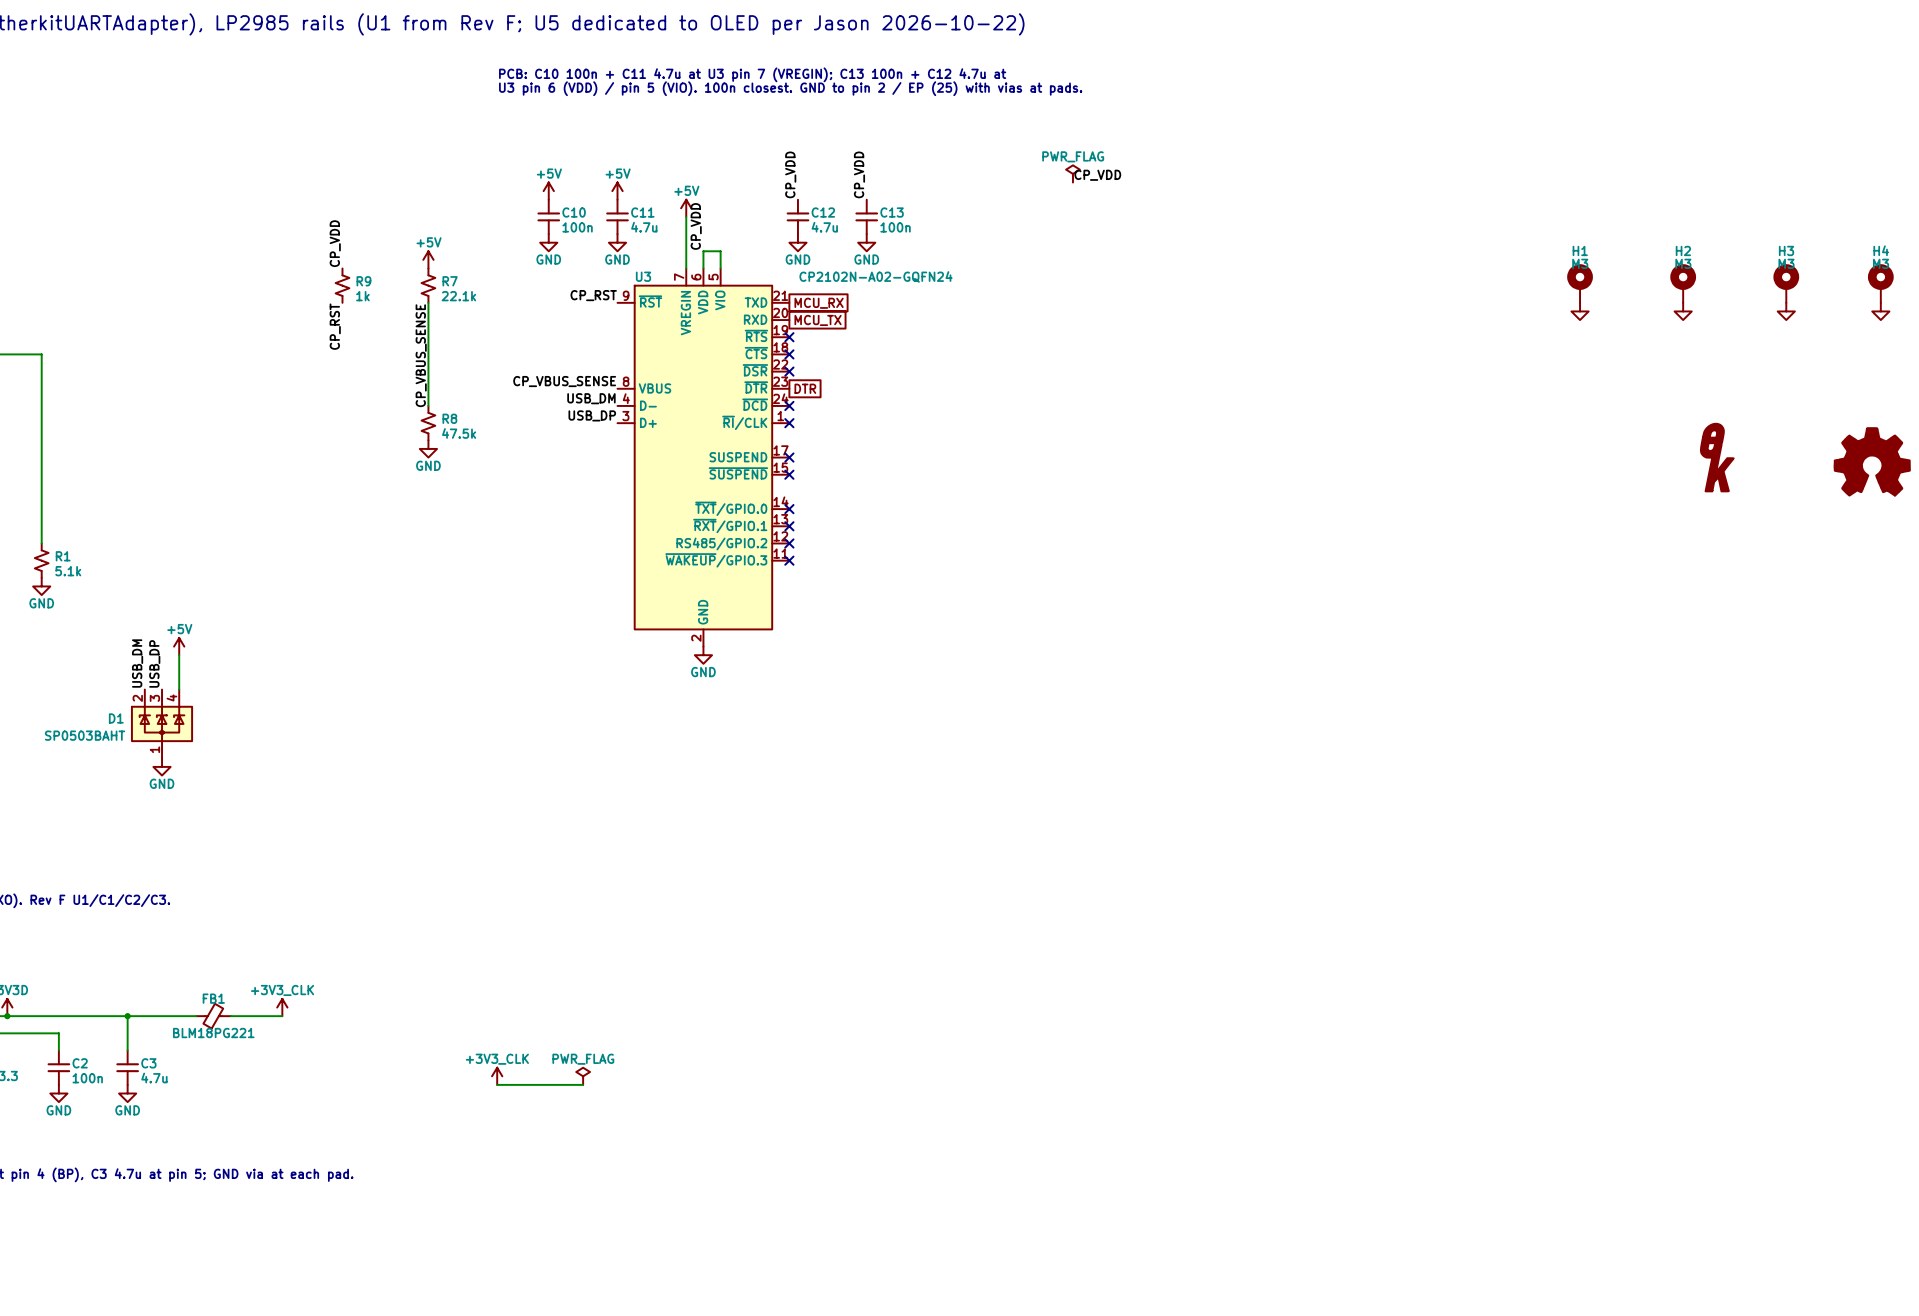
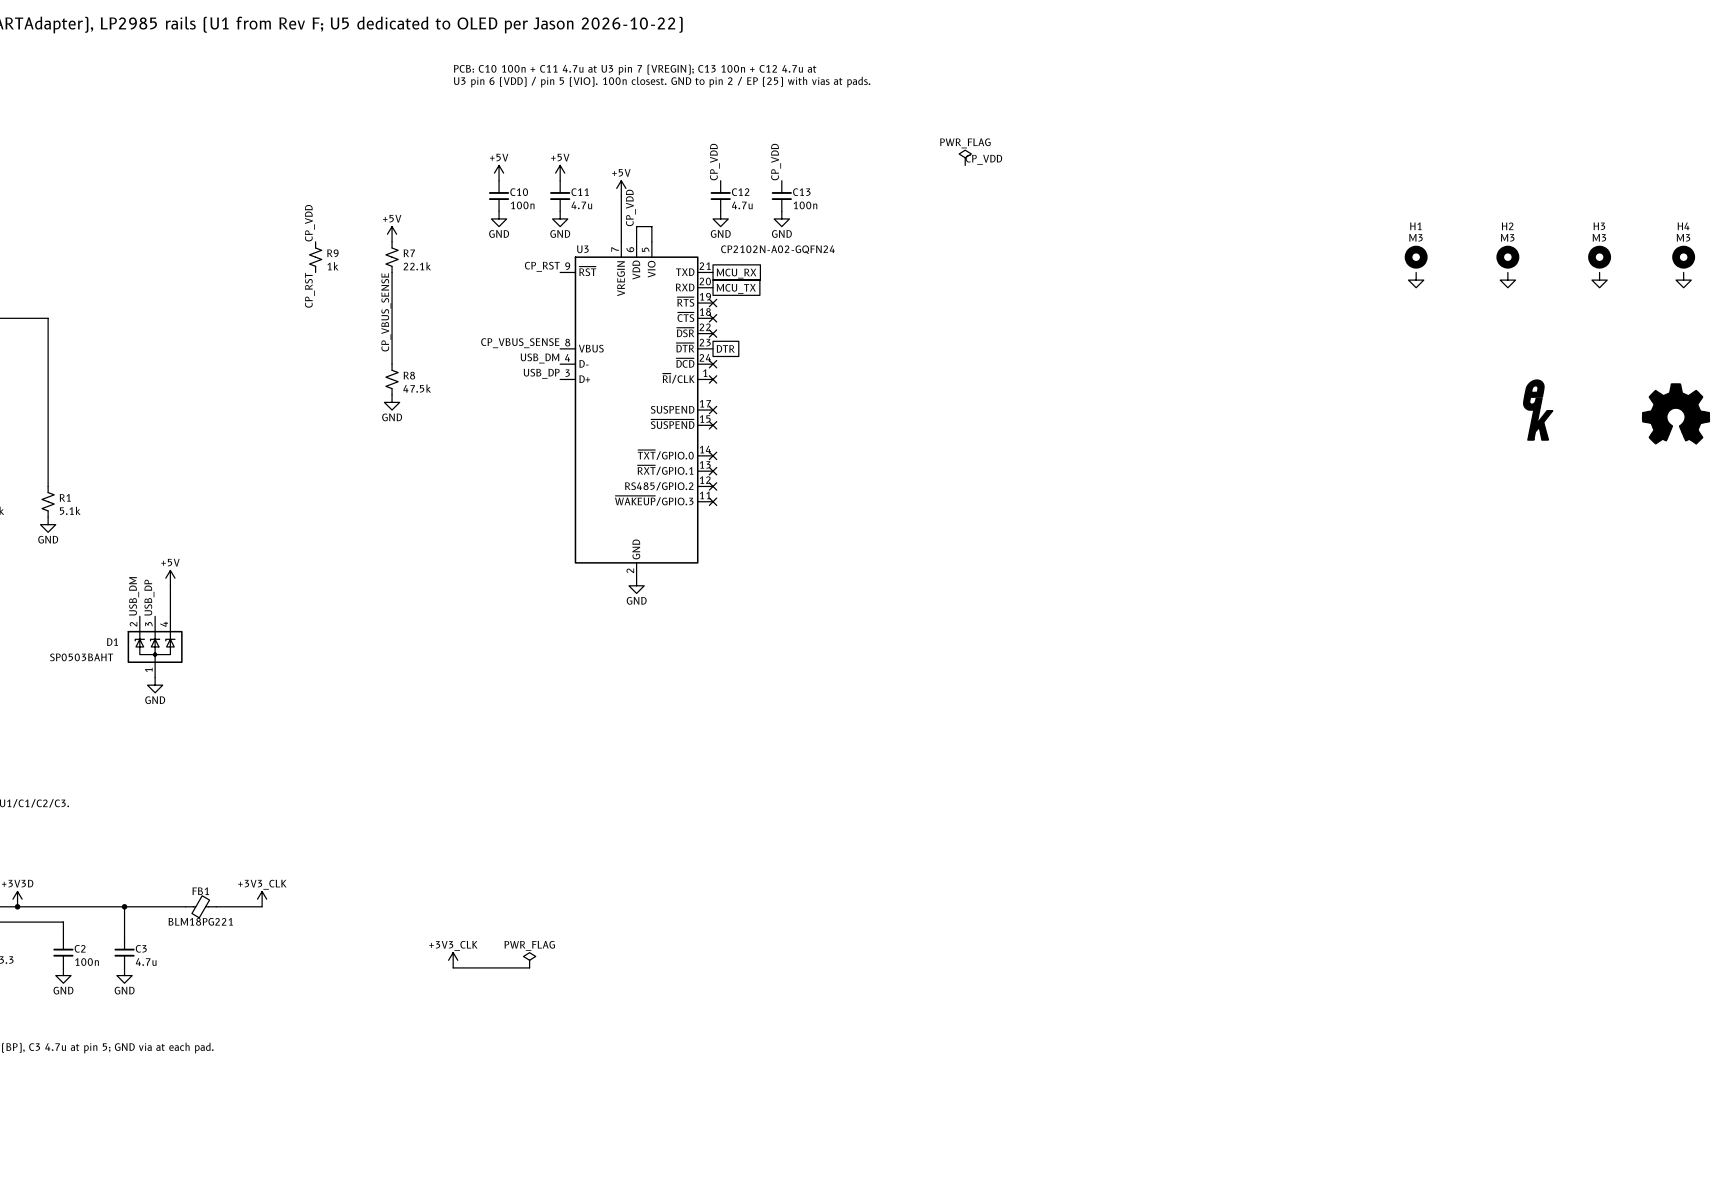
H1 symbol: [1567, 264, 1593, 303] -> [1404, 245, 1428, 269]
H2 symbol: [1670, 264, 1697, 303] -> [1496, 245, 1520, 269]
H3 symbol: [1773, 264, 1800, 303] -> [1588, 245, 1612, 269]
H4 symbol: [1867, 264, 1894, 303] -> [1672, 245, 1696, 269]

